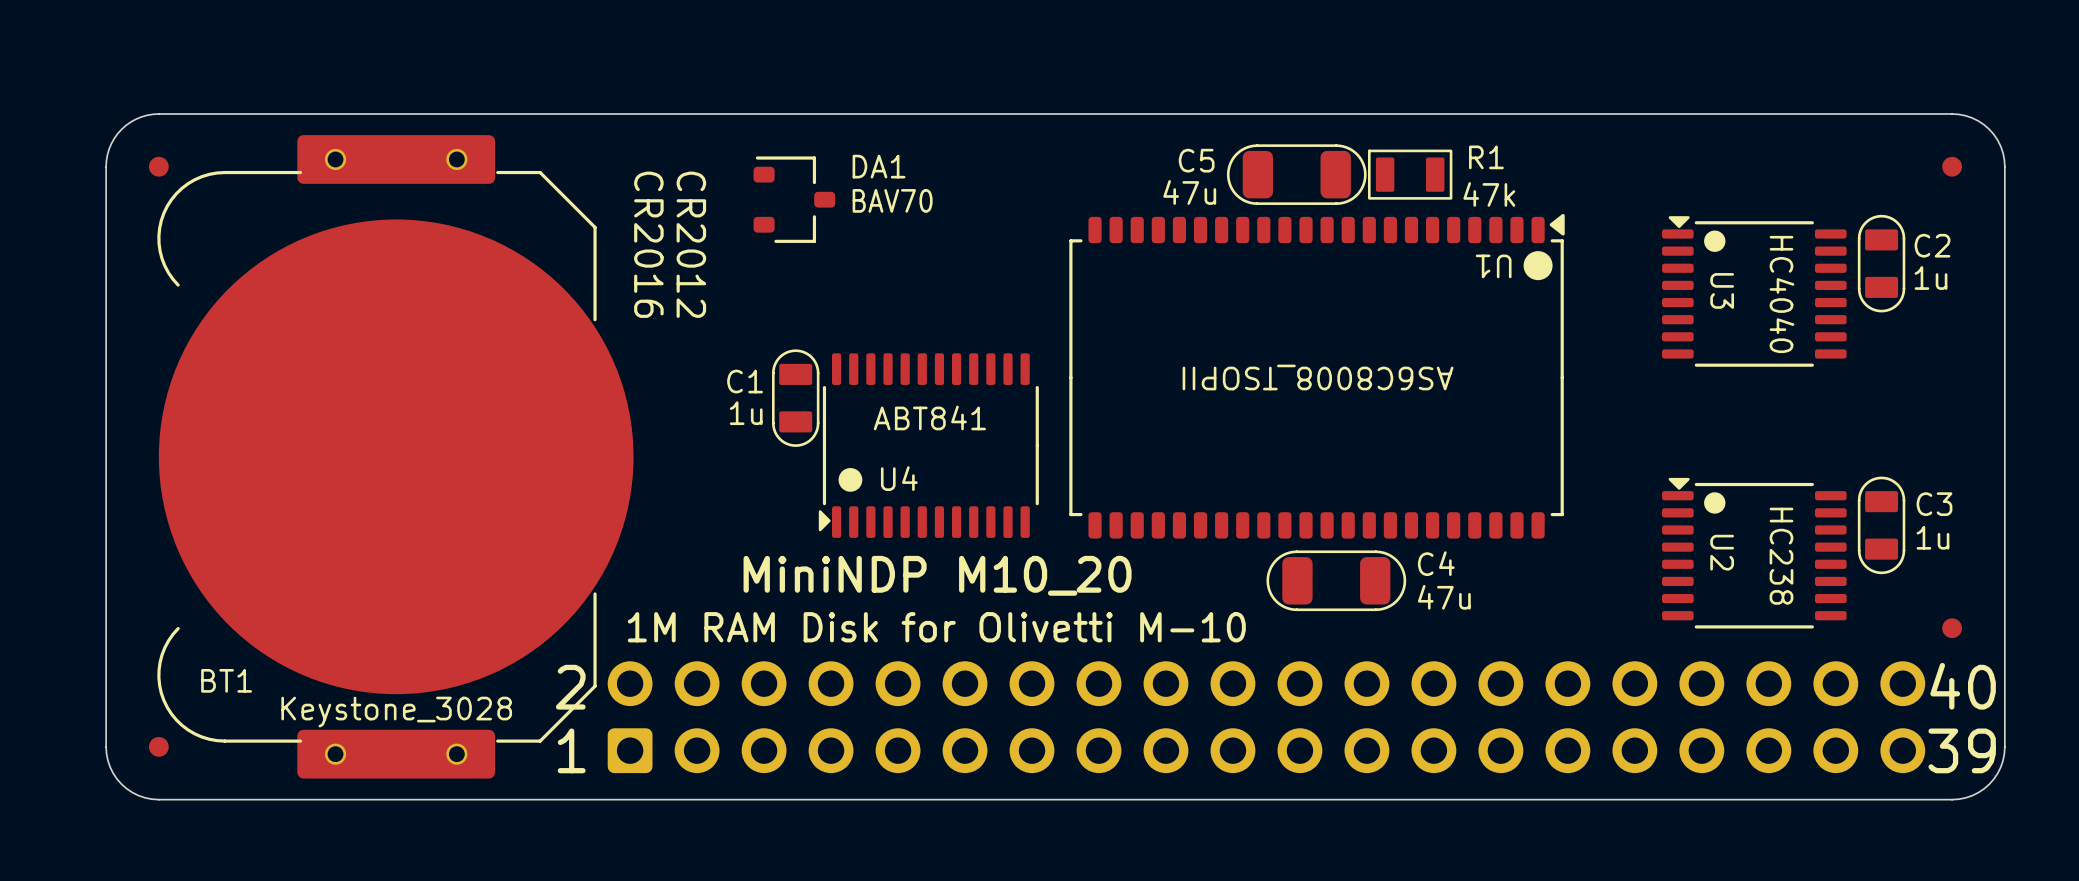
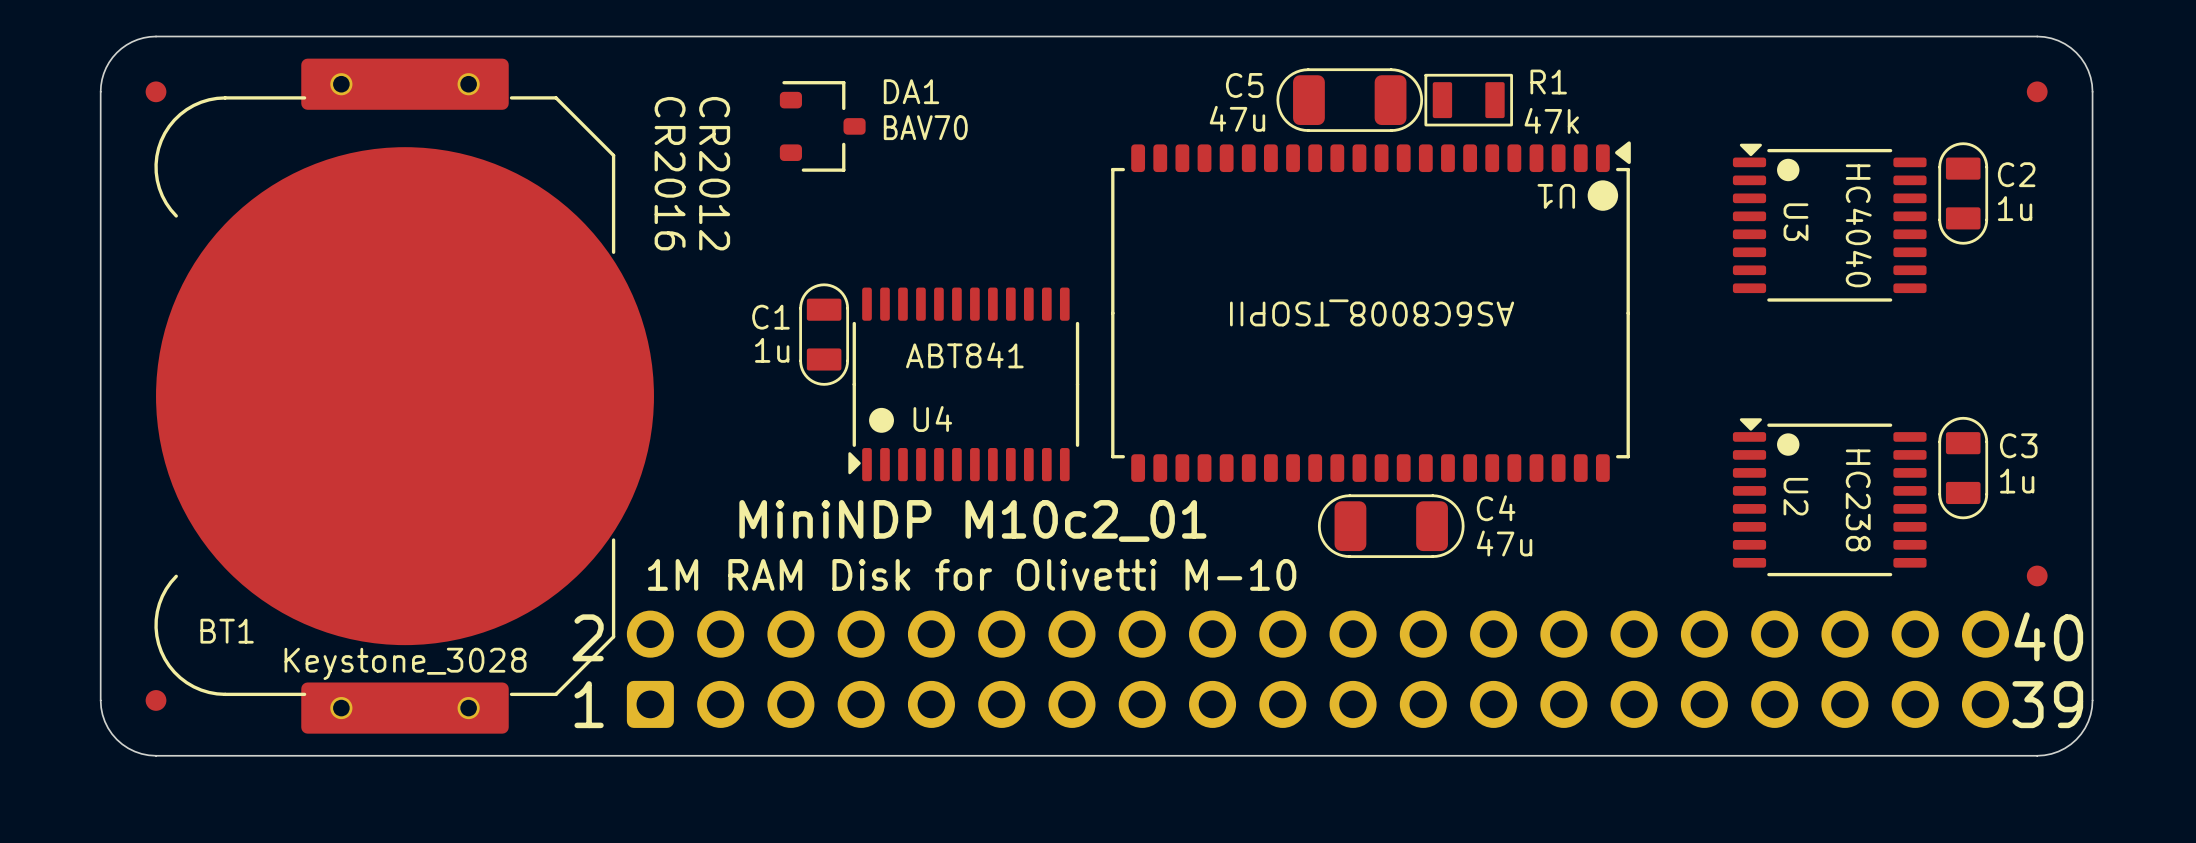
text: MiniNDP M10_20 (937, 575) -> MiniNDP M10c2_01 (972, 520)

